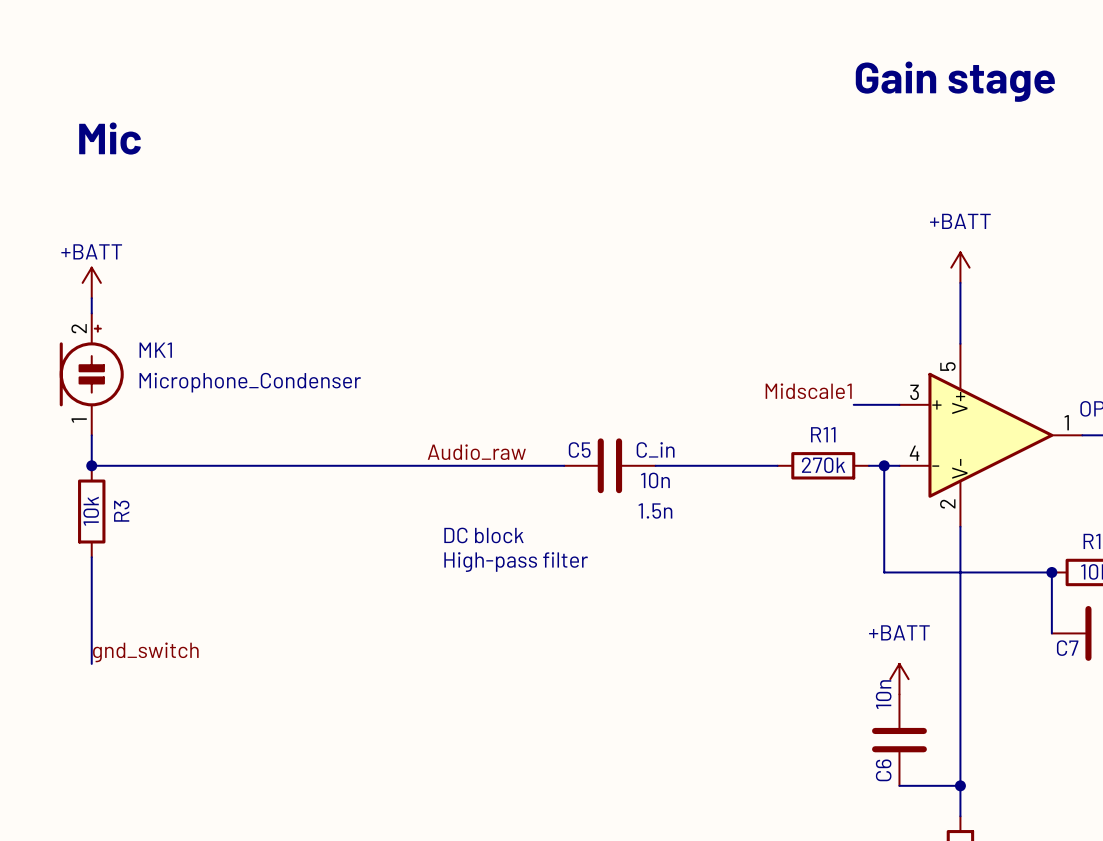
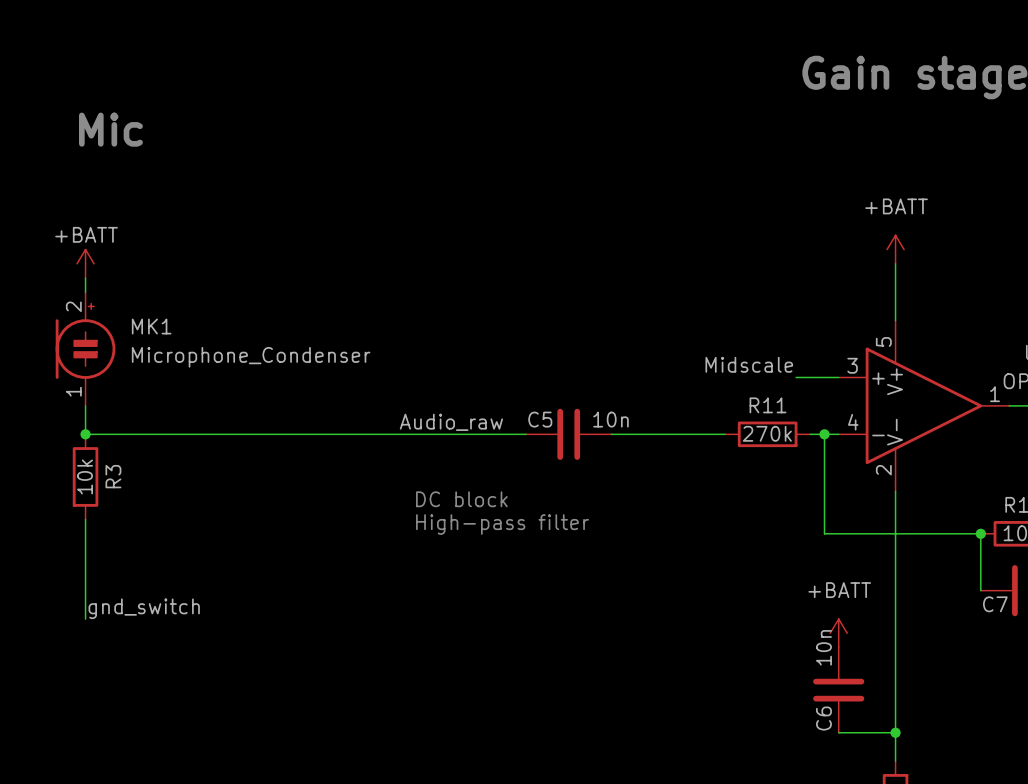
label: Midscale1 (808, 391) -> Midscale (749, 364)
C5 value: C_in (655, 449) -> 10n (611, 419)
C5 text: 10n (655, 480) -> none
C5 text: 1.5n (655, 511) -> none

